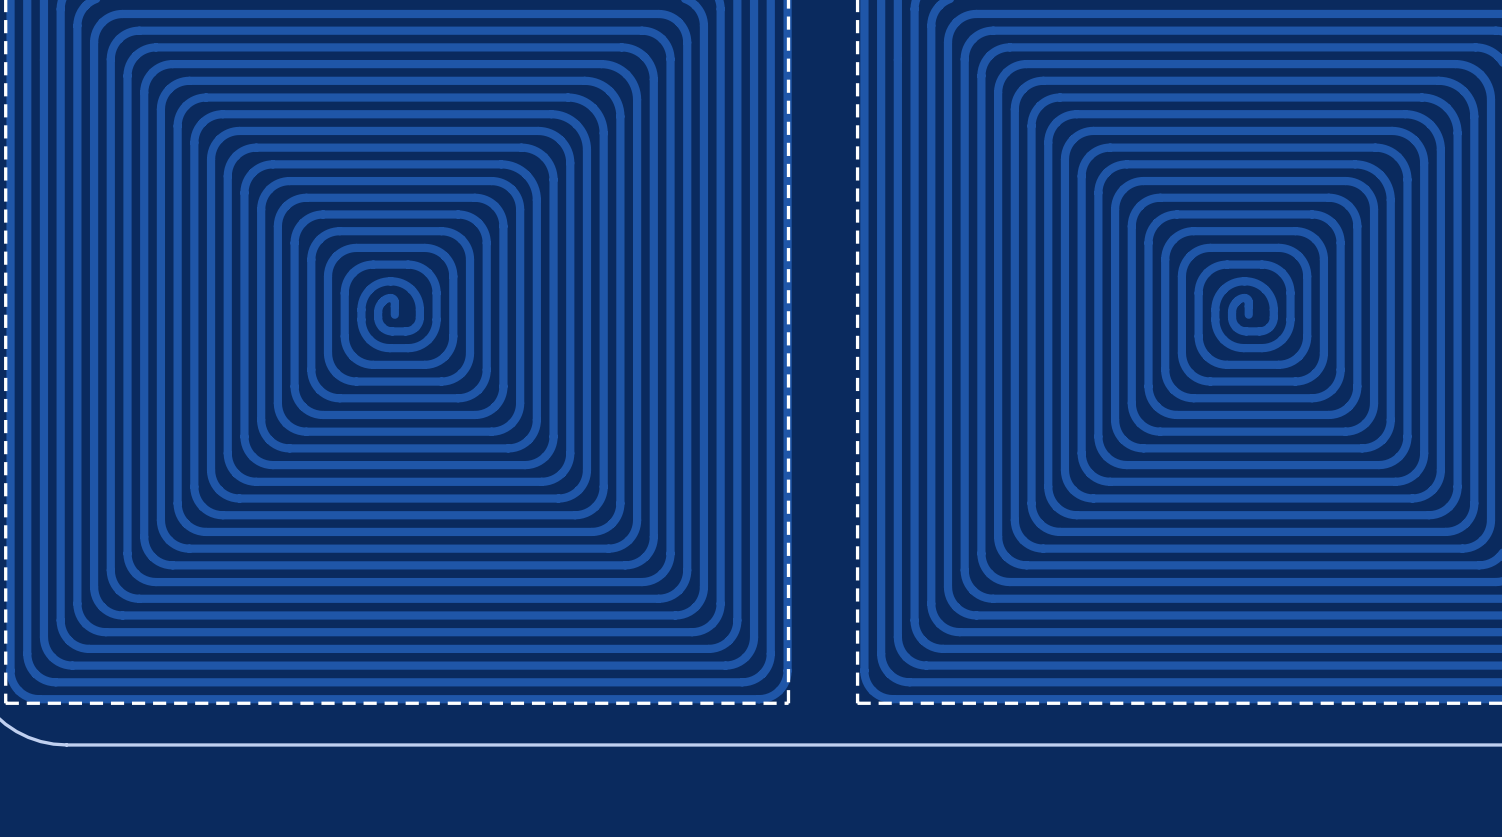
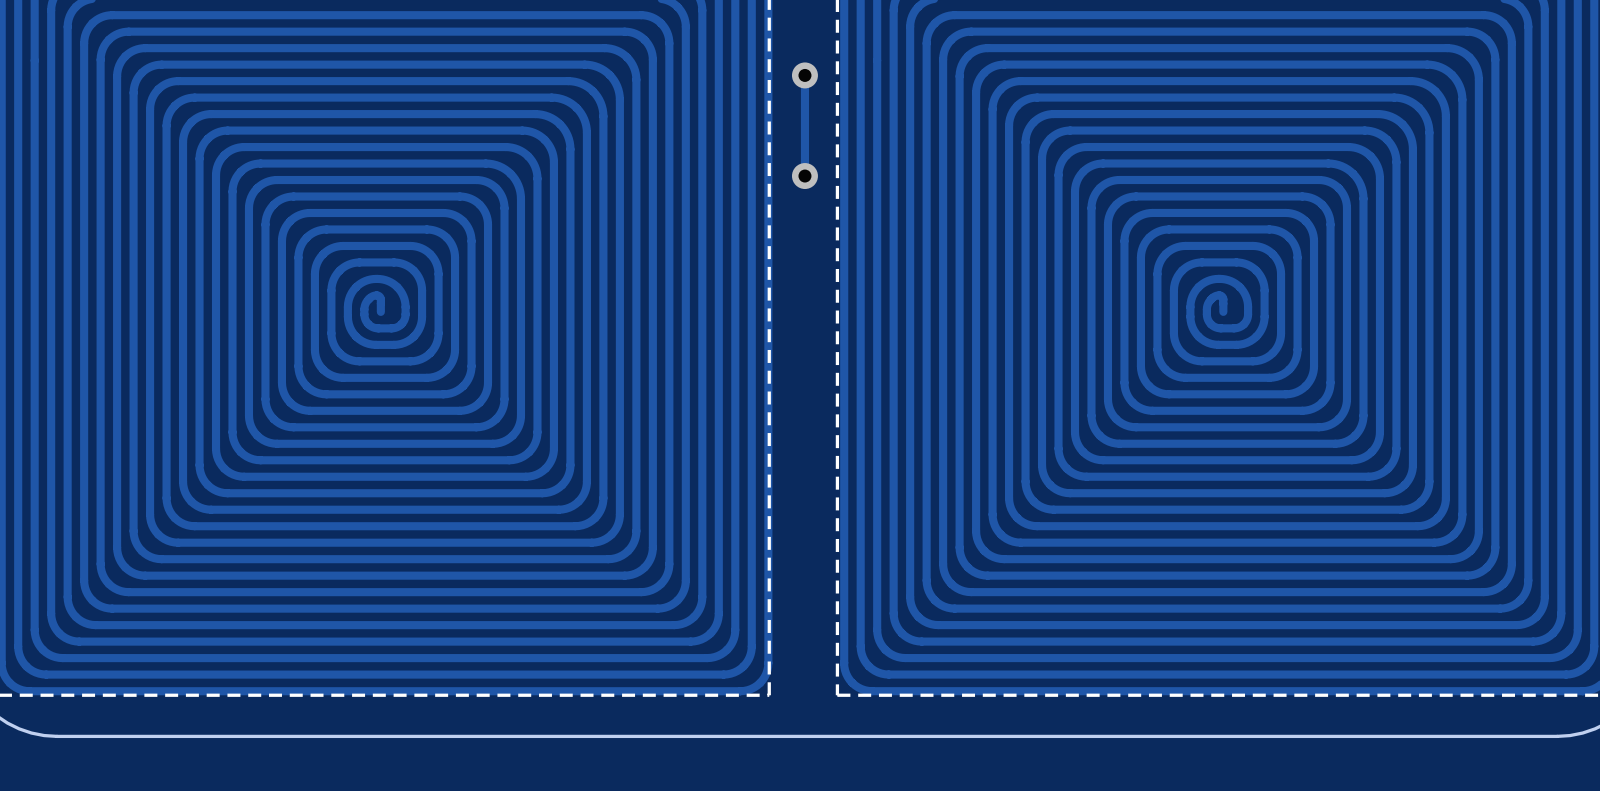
track: none -> (804, 75) (804, 176)
via: none -> (804, 75)
via: none -> (804, 176)

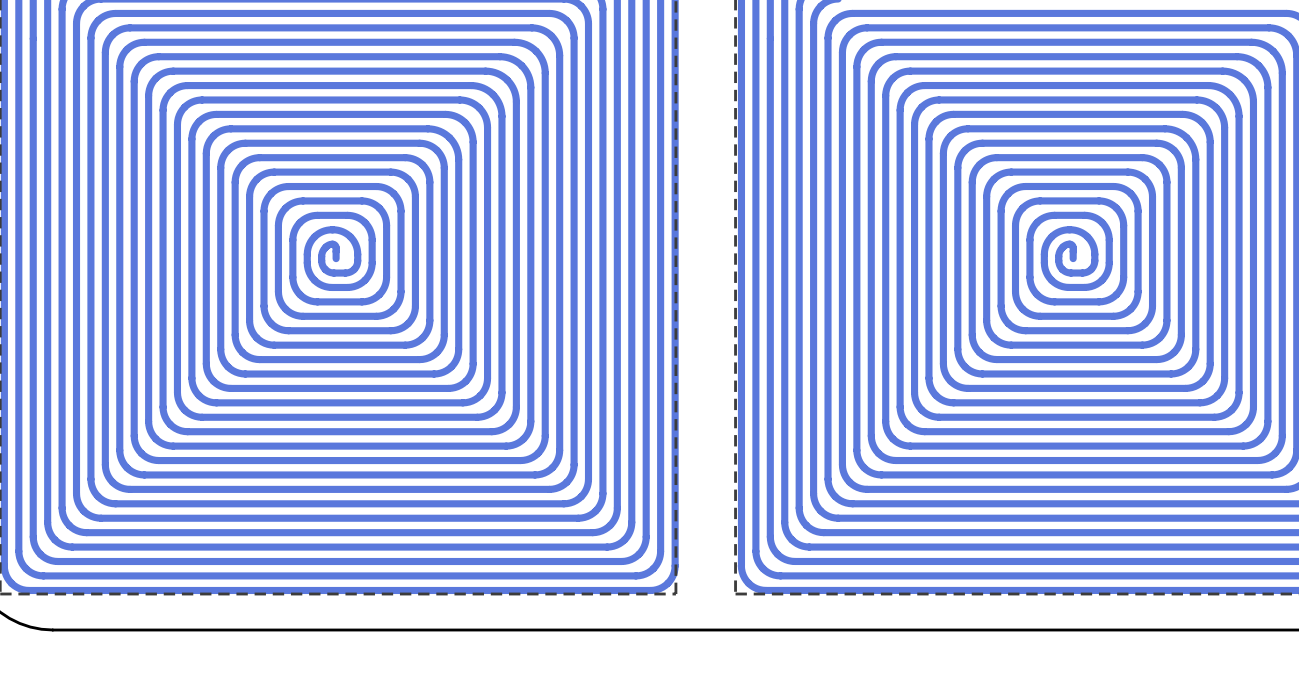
track: (804, 75) (804, 176) -> none
via: (804, 75) -> none
via: (804, 176) -> none

